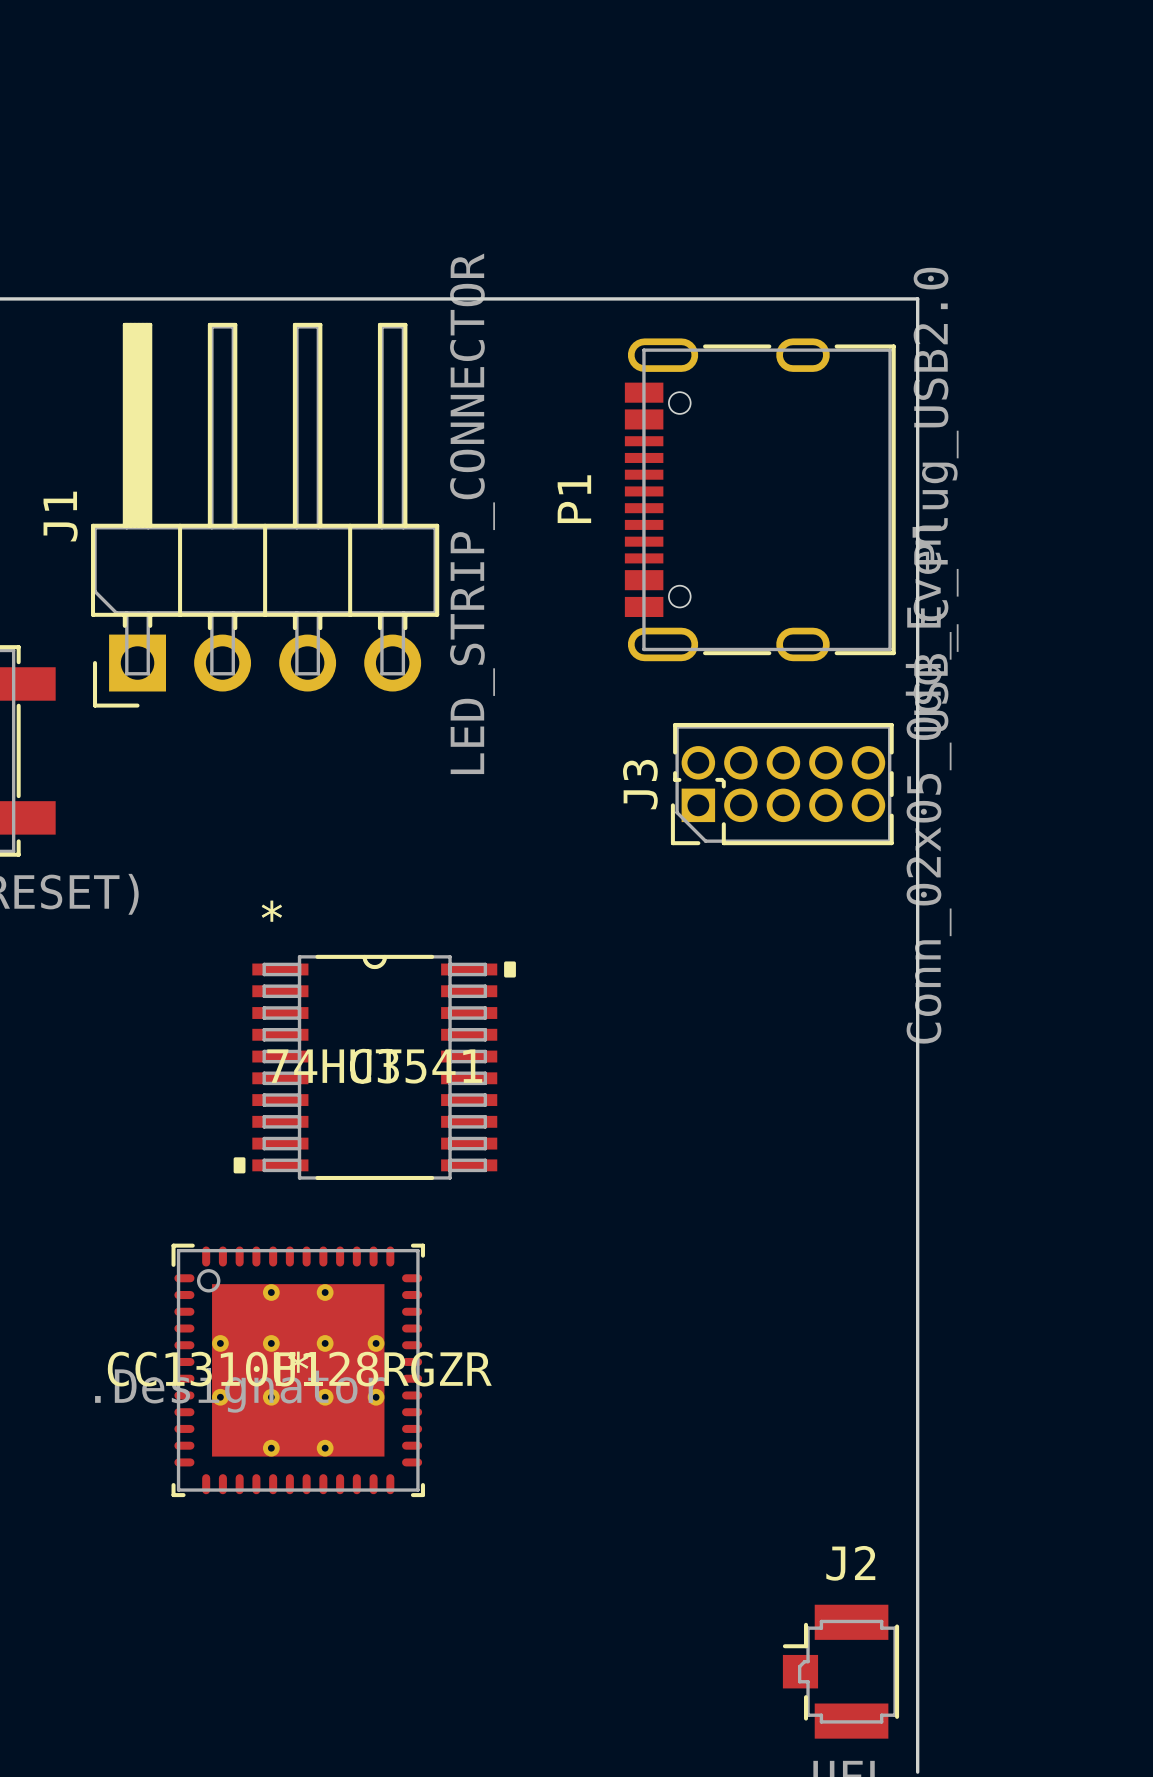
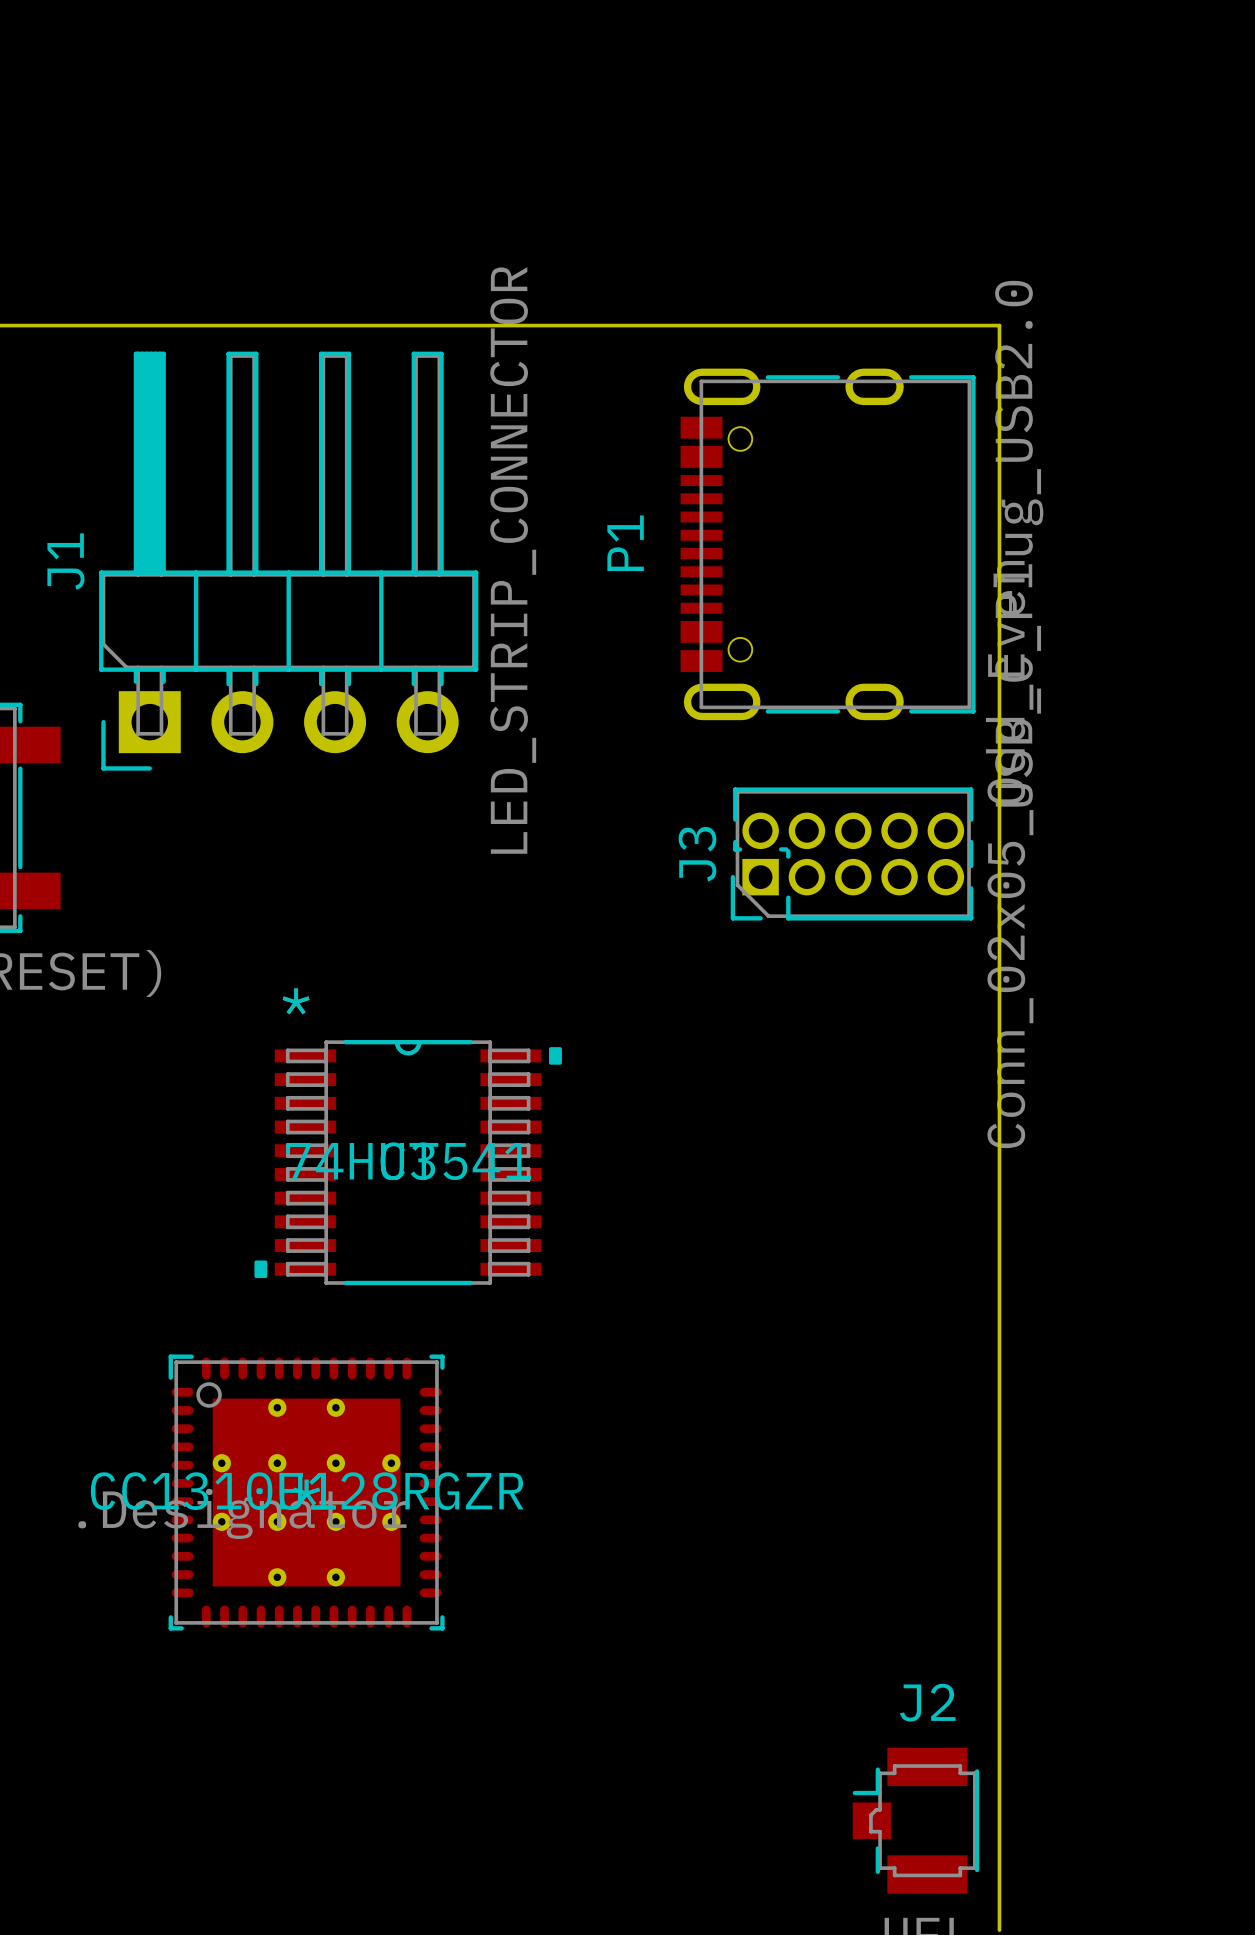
part position: (298, 1370) -> (306, 1492)

